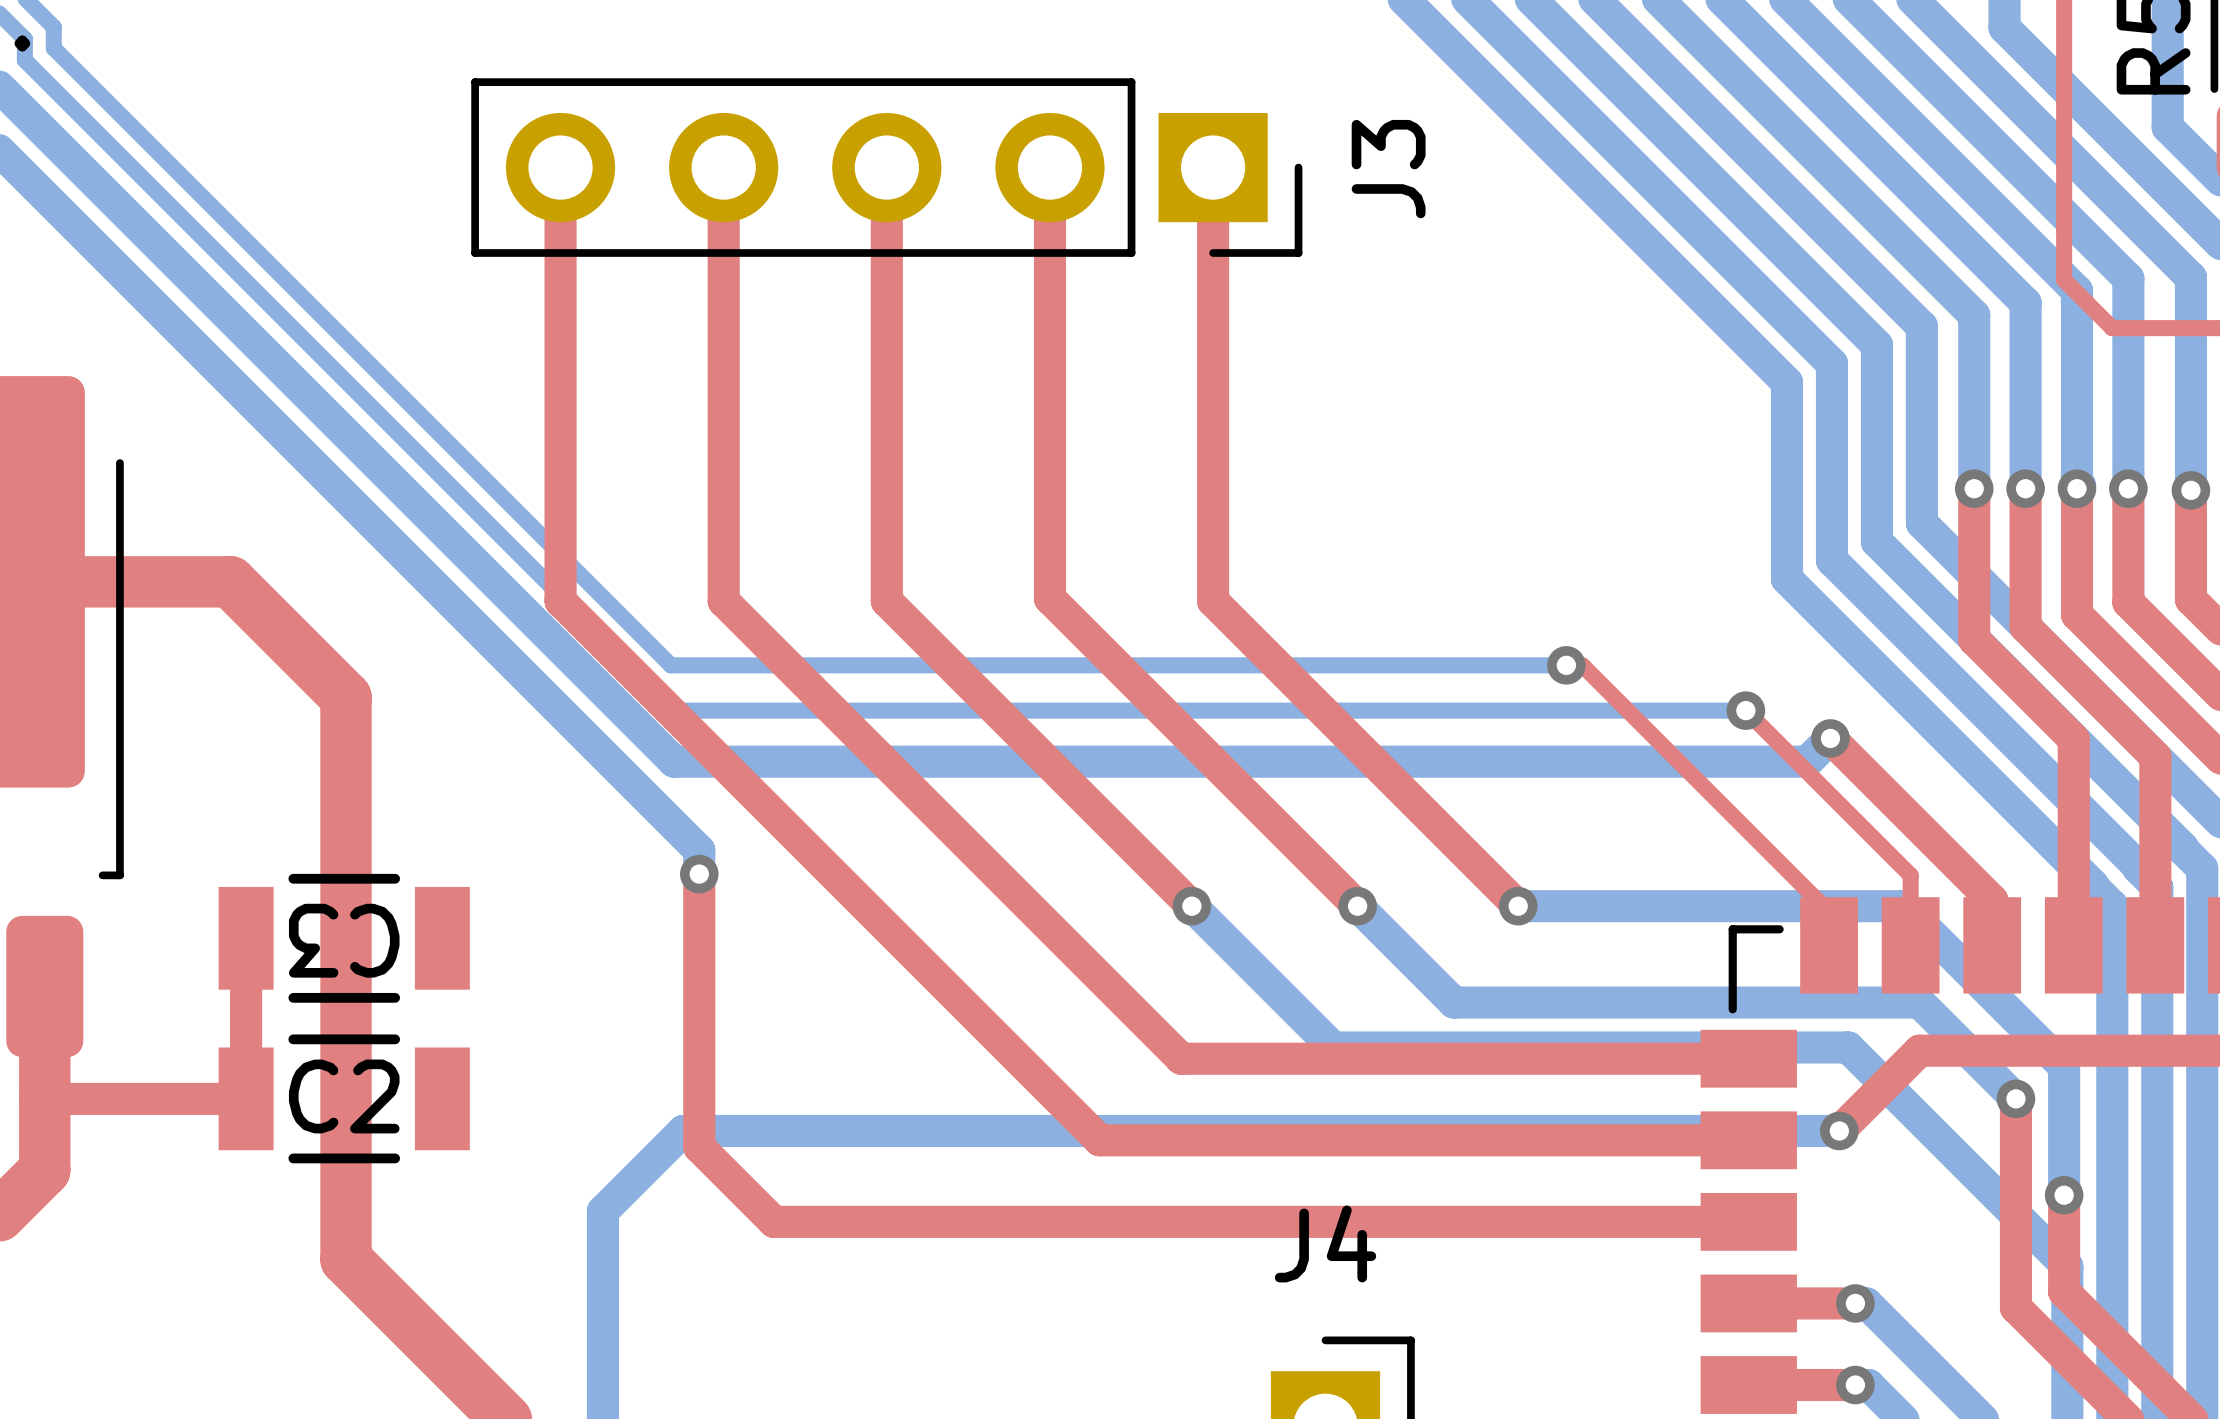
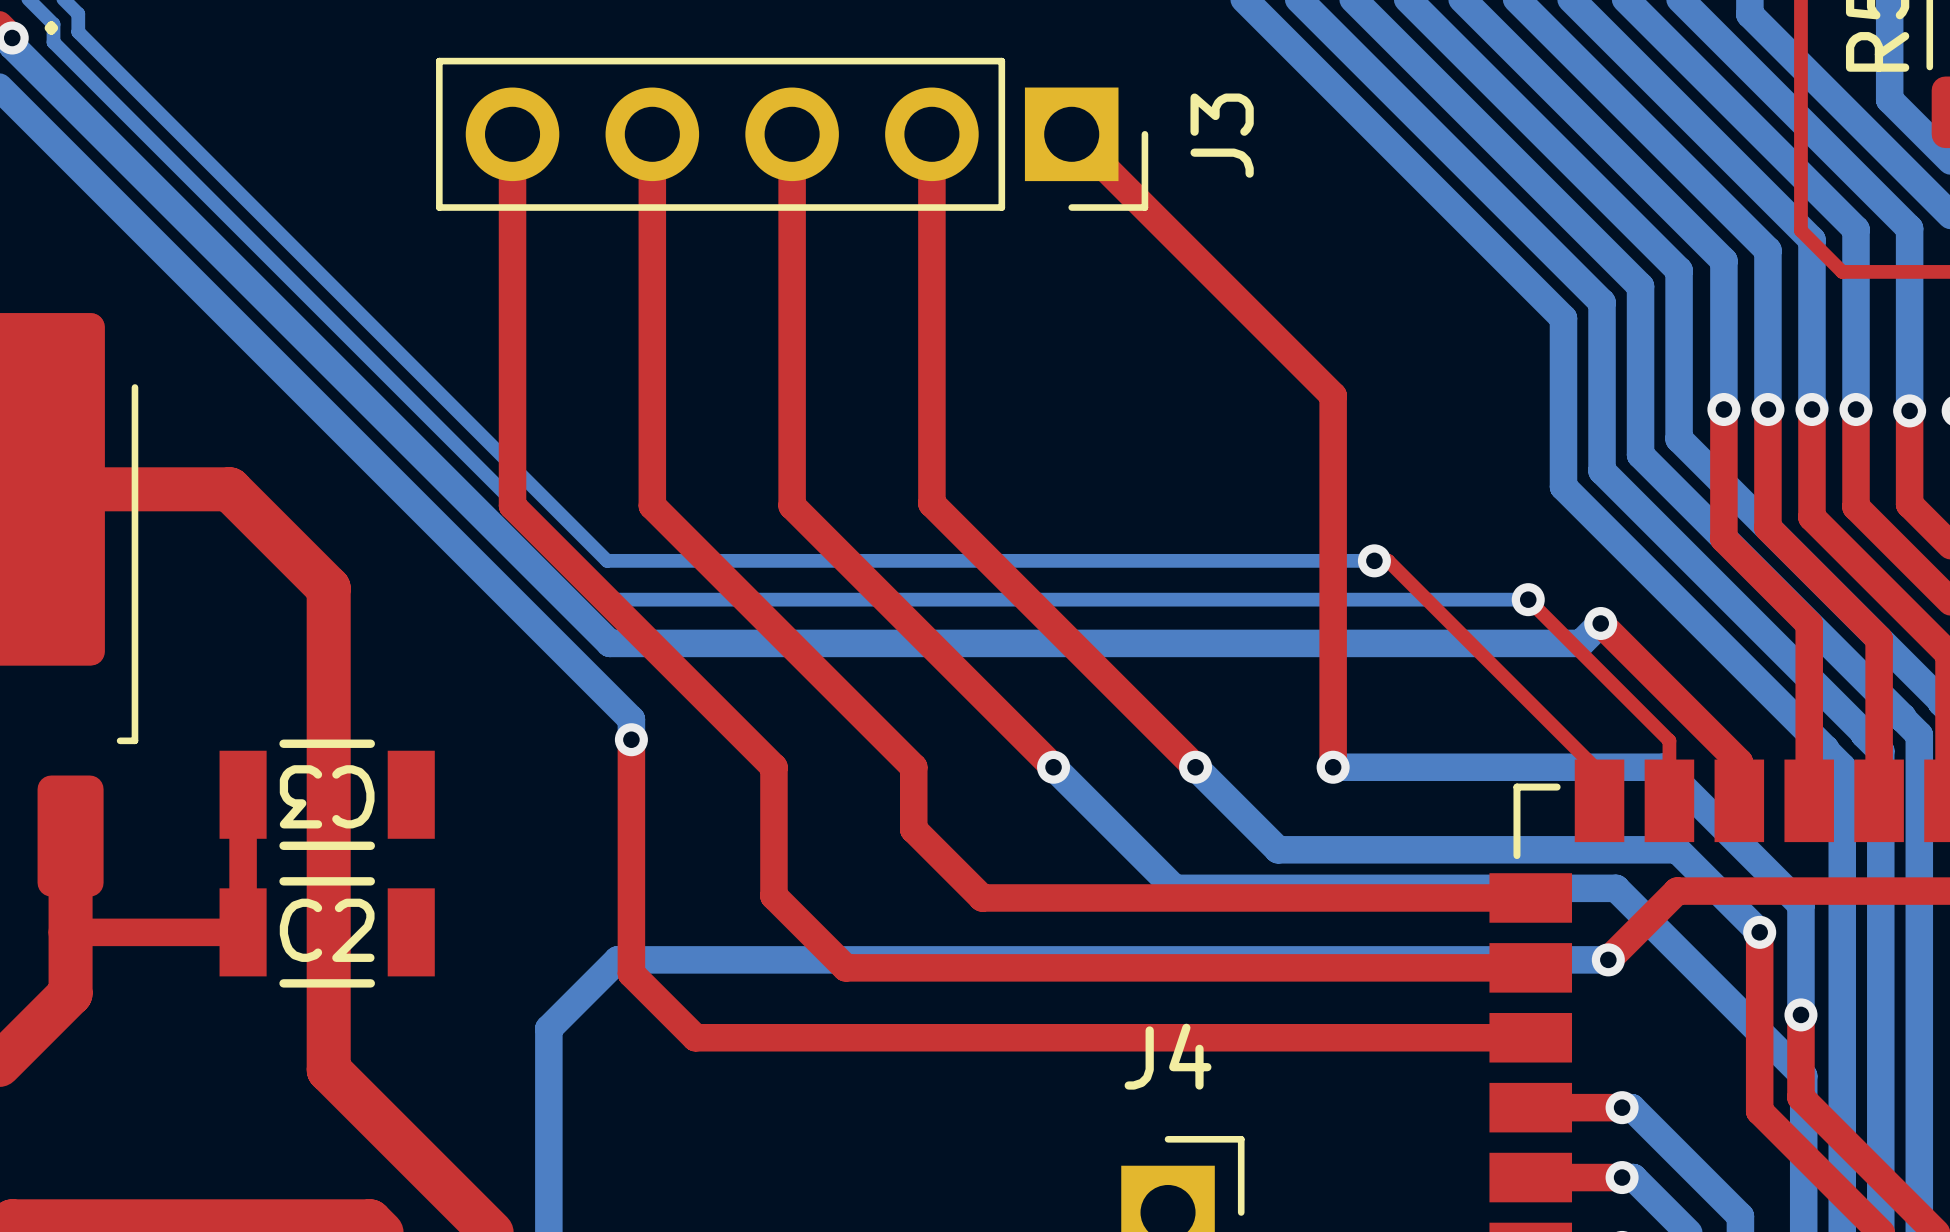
top track: (1213, 167) (1213, 601) (1518, 906) -> (1071, 134) (1333, 395) (1333, 767)
top track: (865, 906) (1099, 1140) -> (773, 767) (773, 896) (845, 967) (974, 967)
top track: (1028, 906) (1181, 1058) -> (913, 767) (913, 829) (982, 897) (1044, 897)

